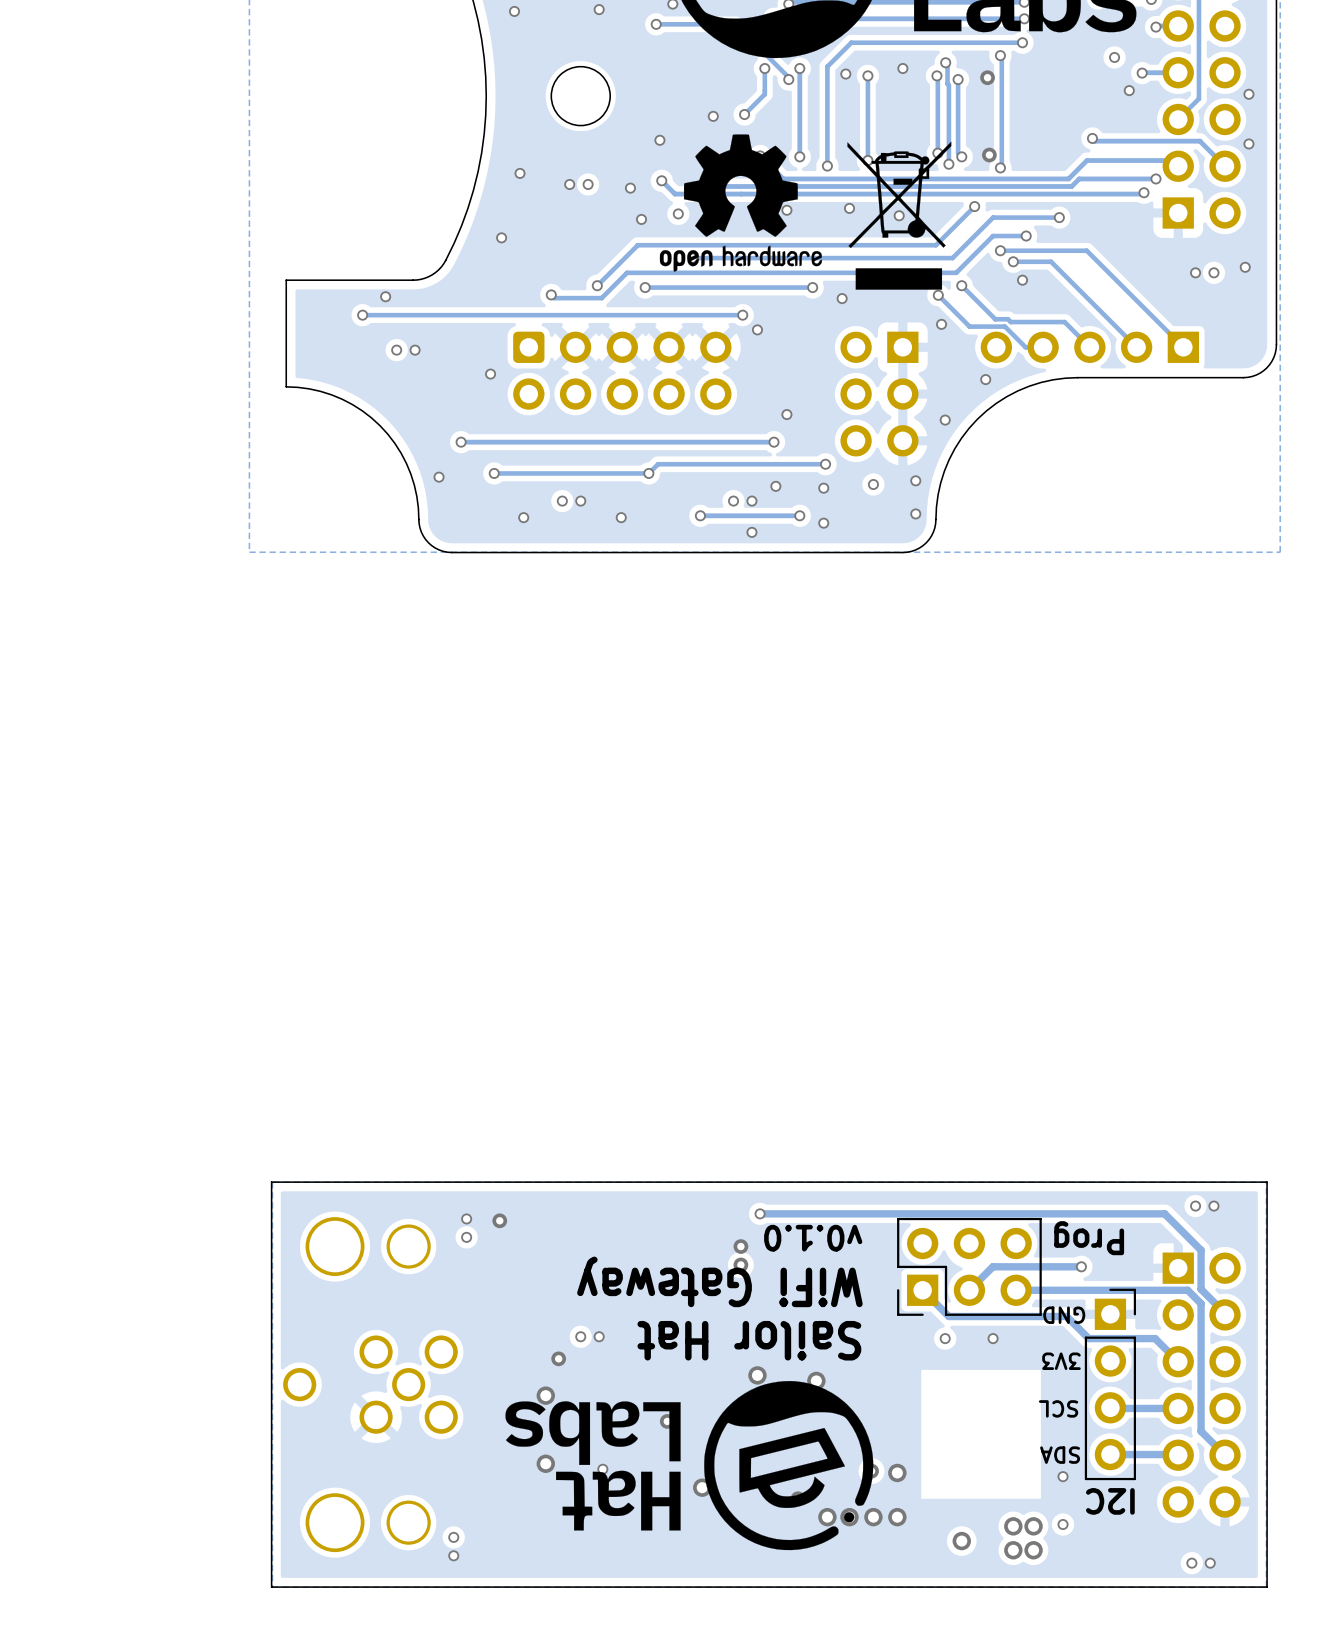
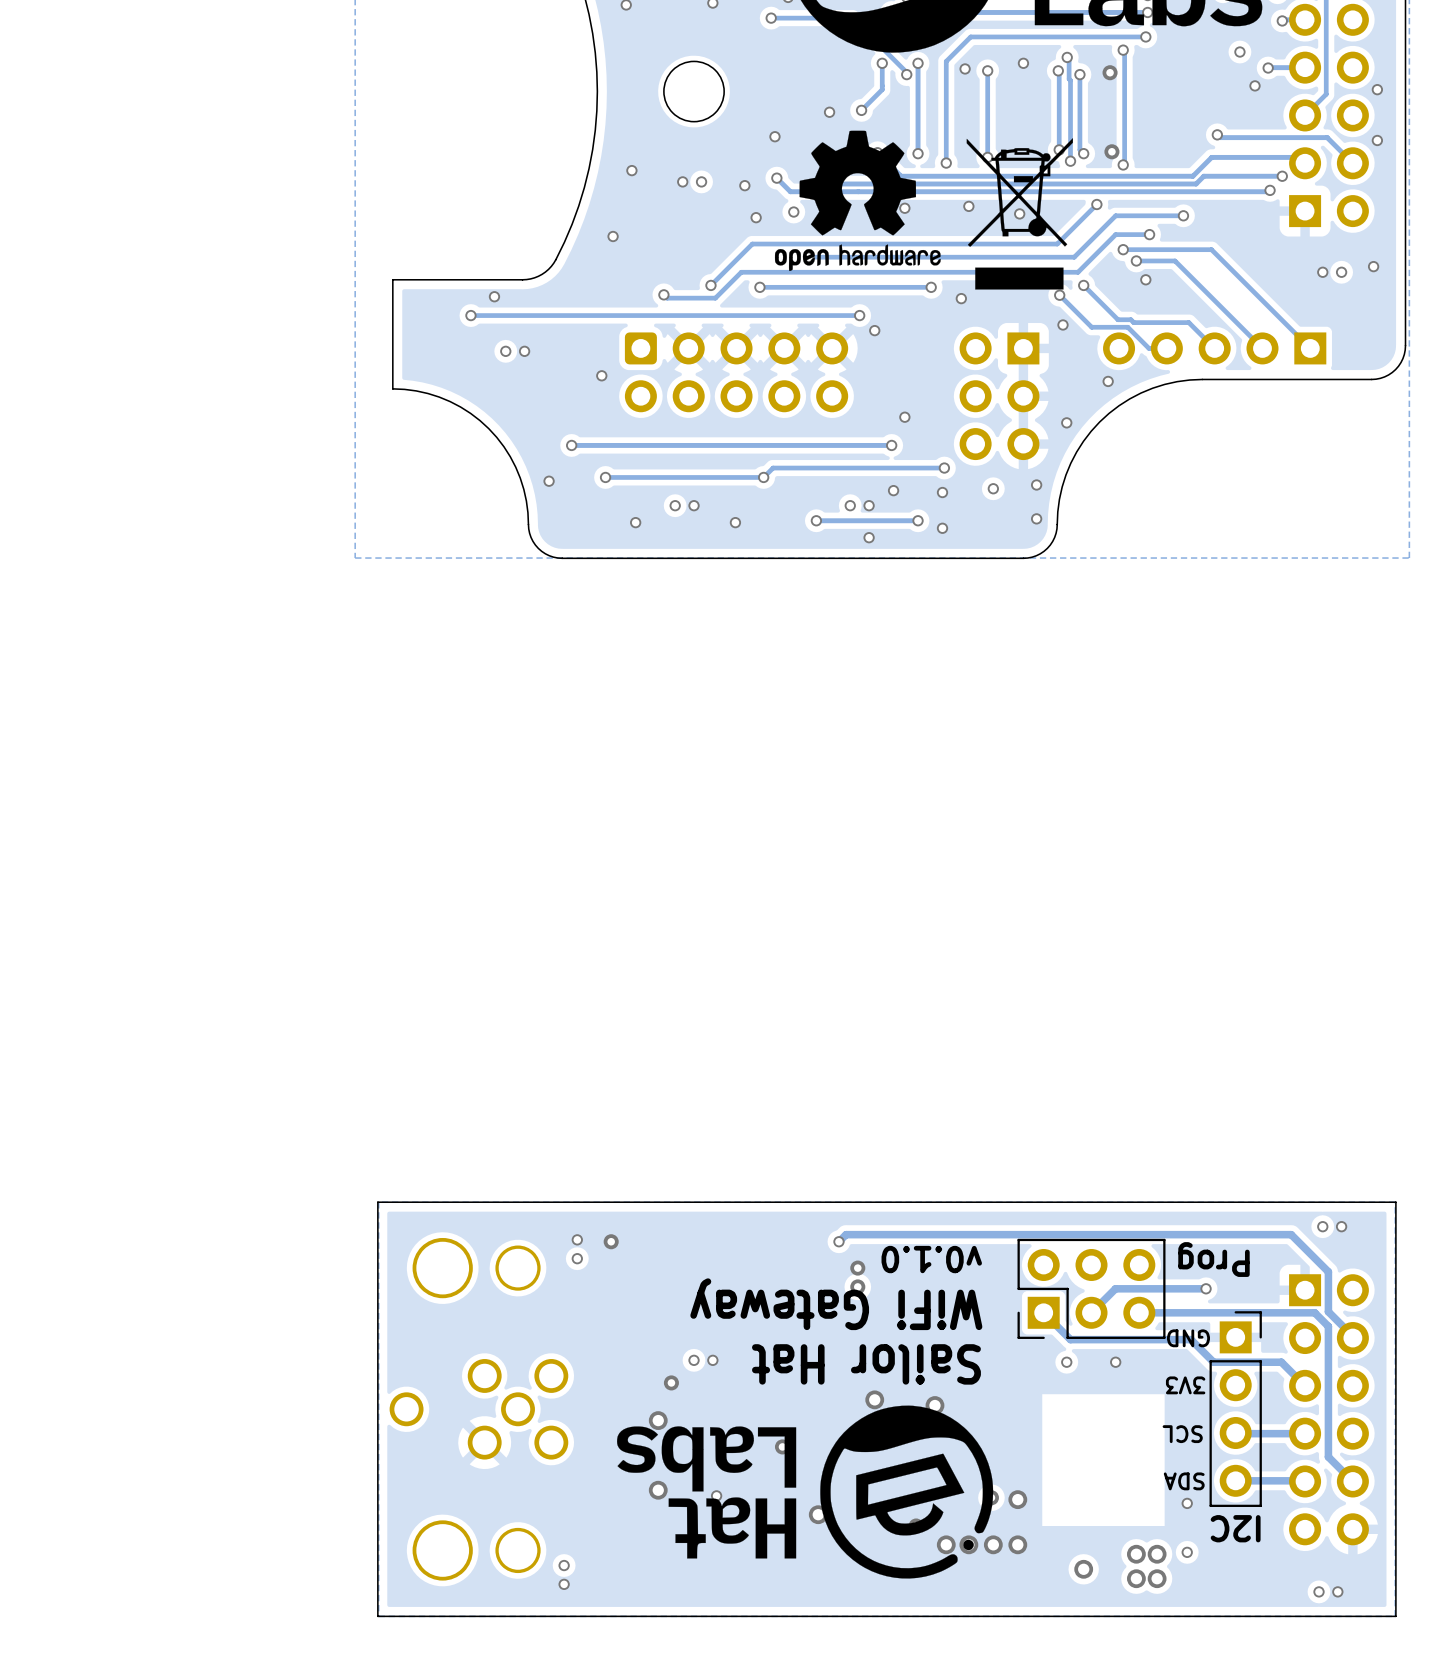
track: none -> (877, 1234) (846, 1234) (838, 1241)
via position: (760, 1213) -> (838, 1241)

